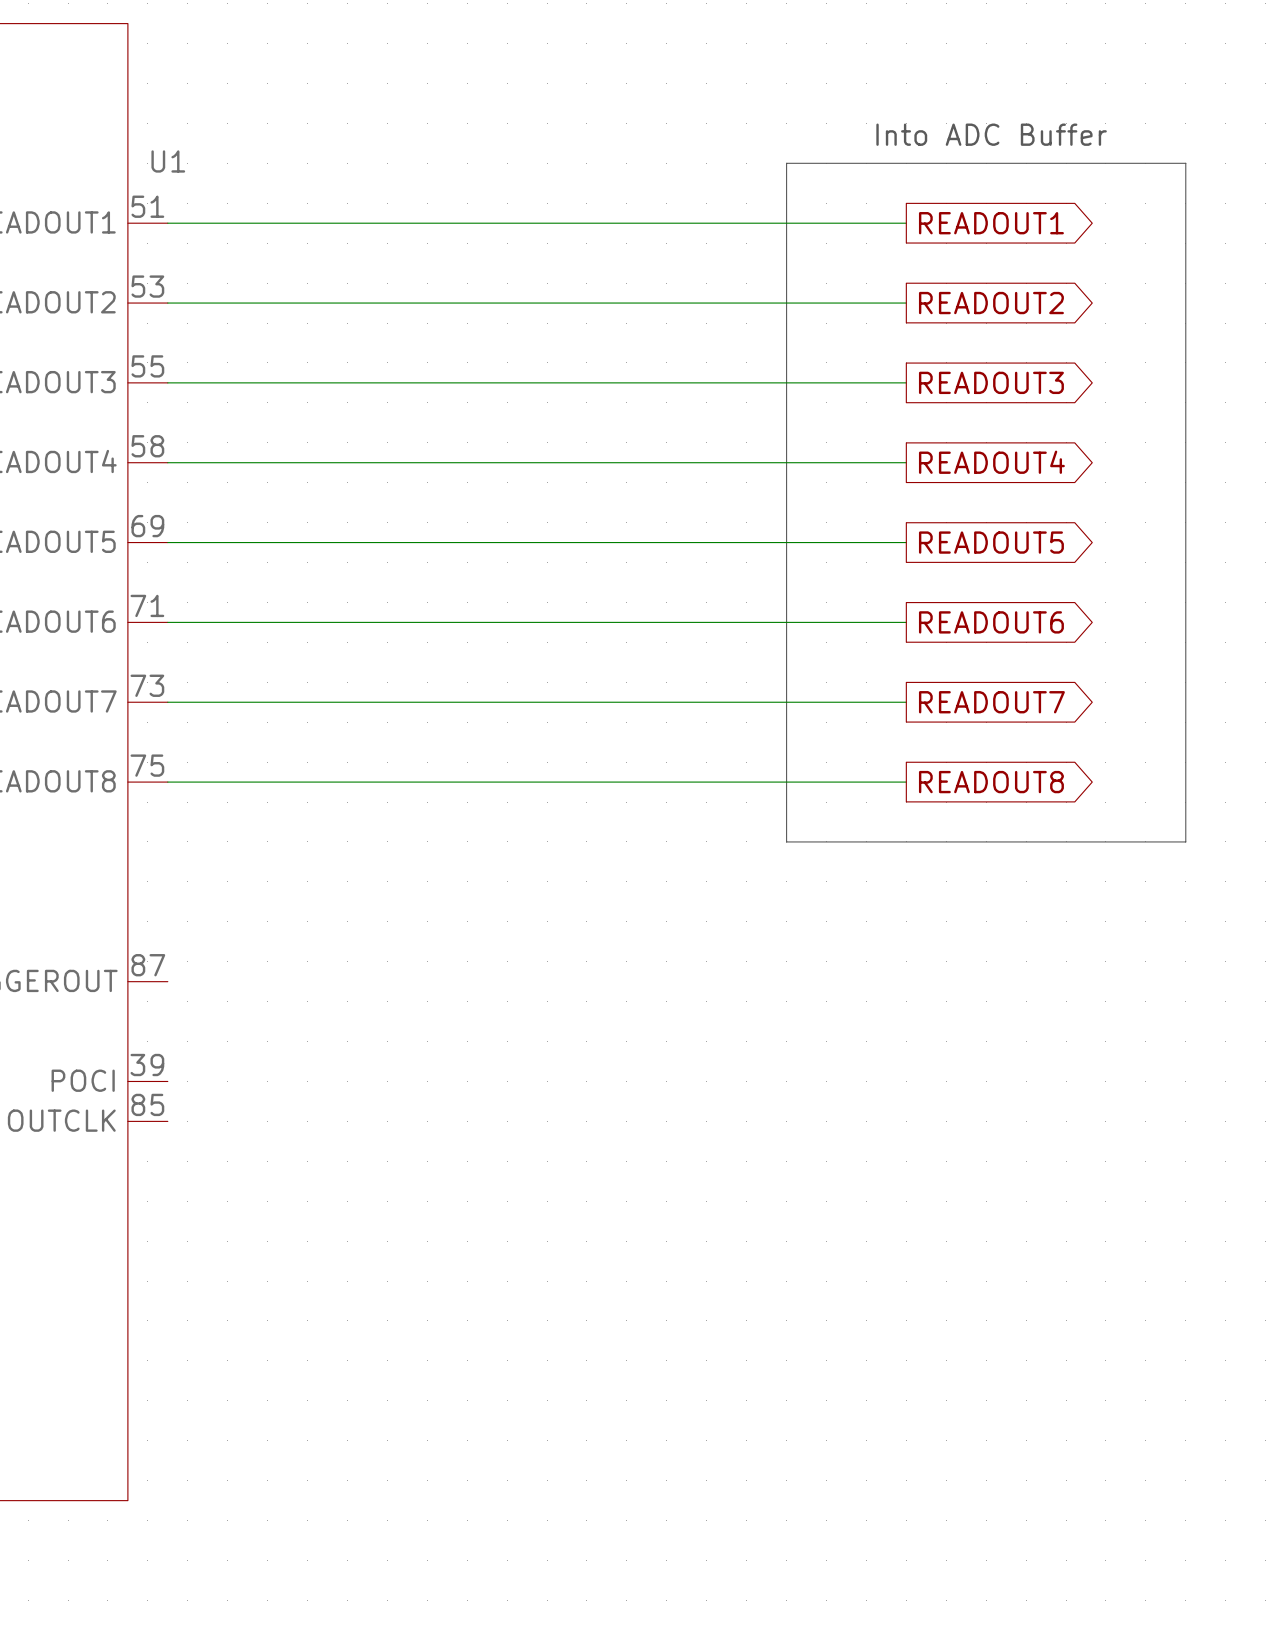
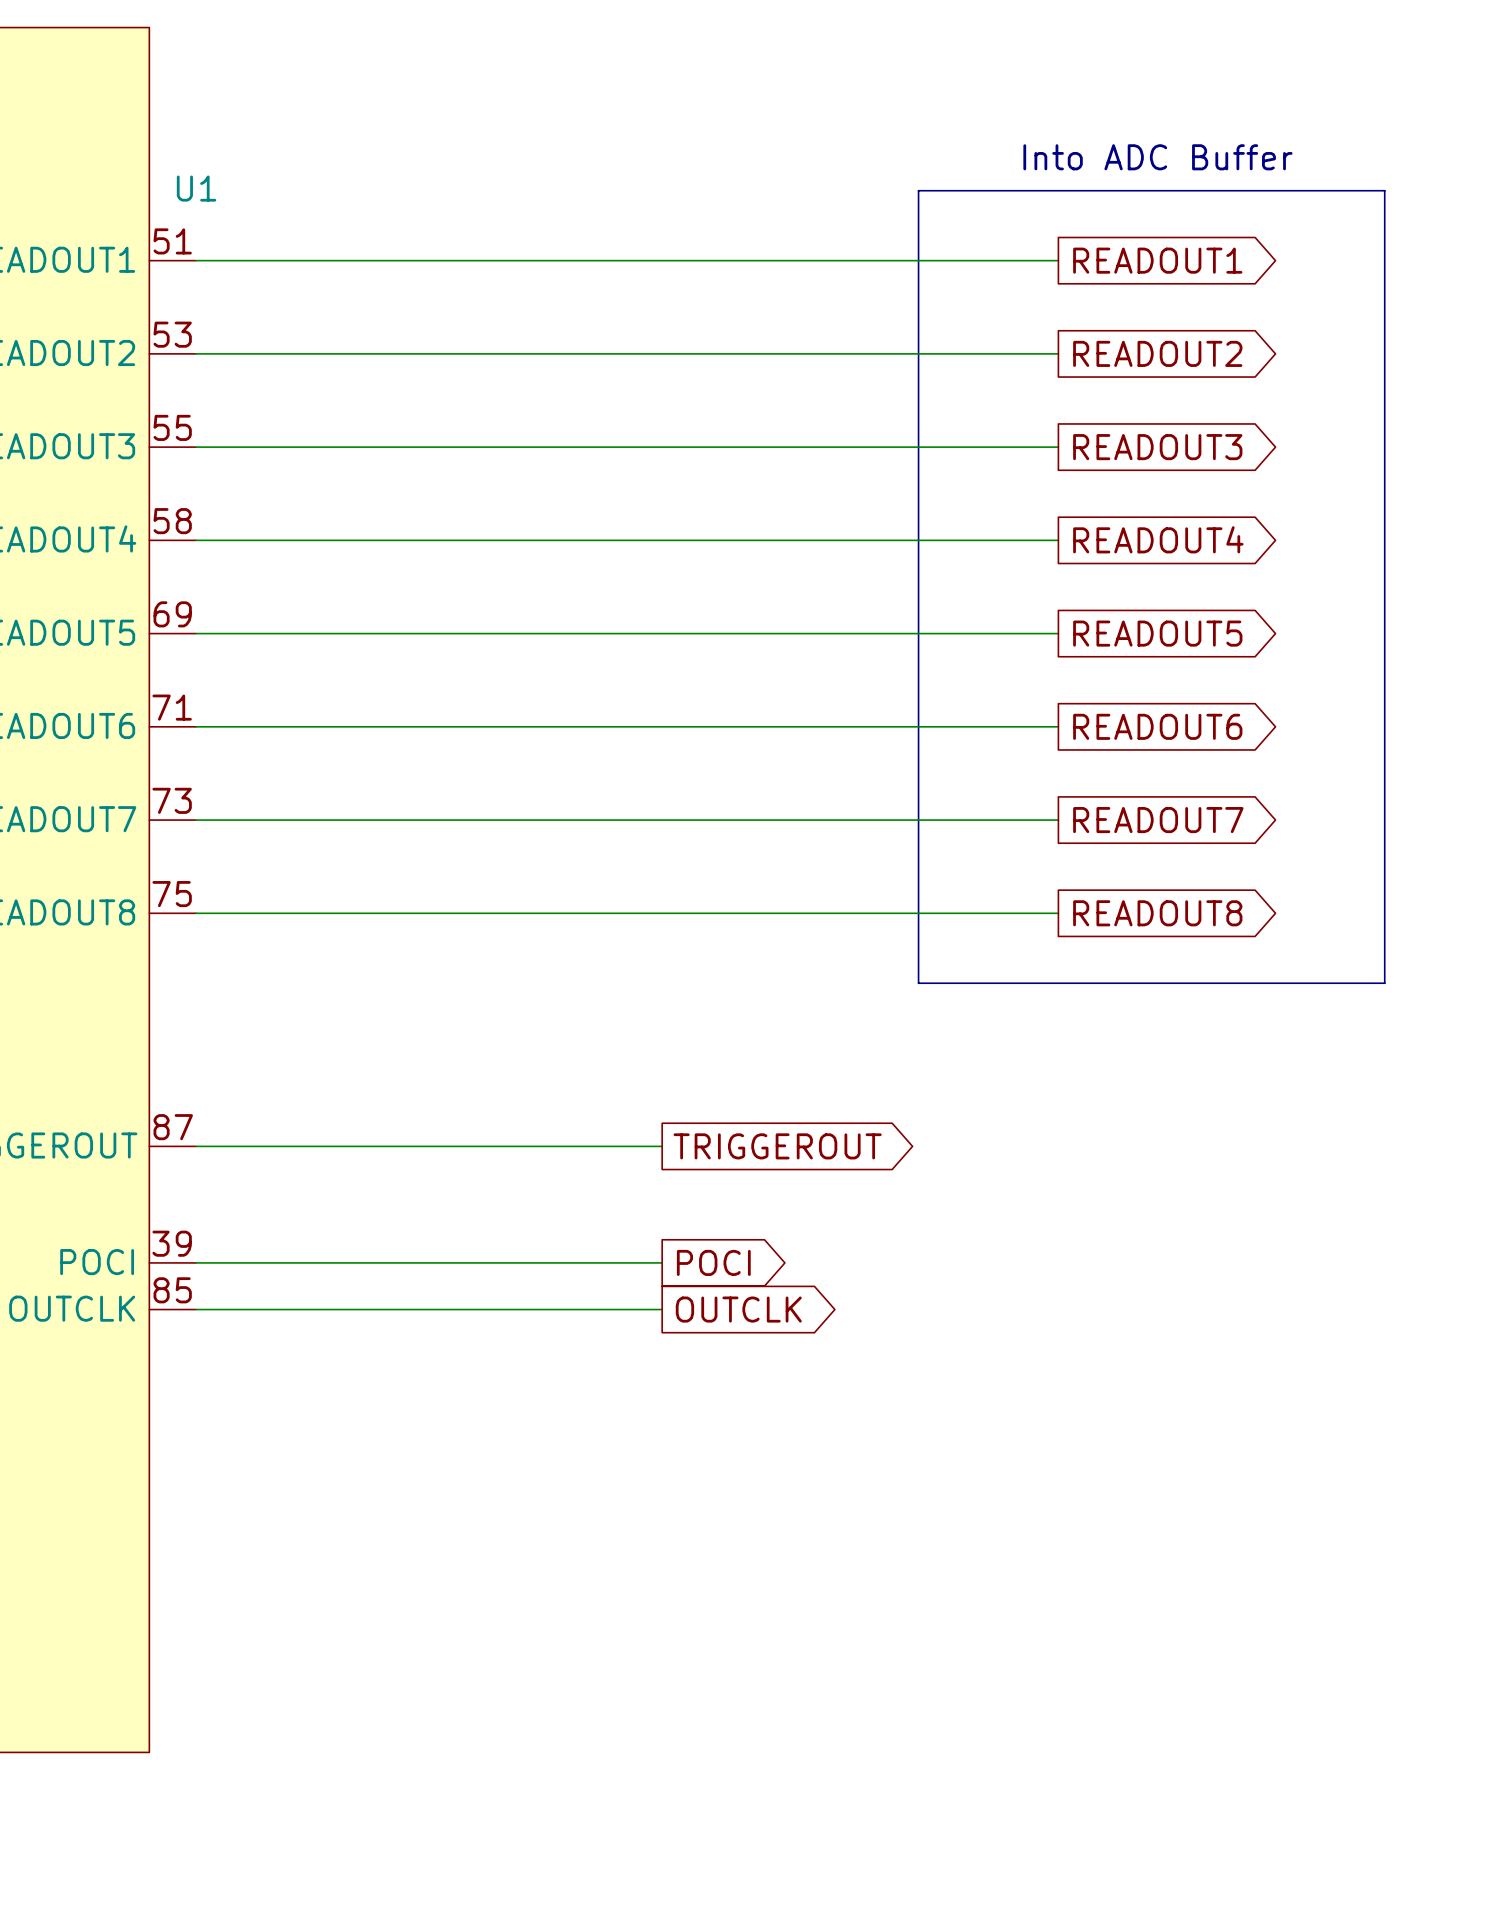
wire: none -> (195, 1146) (662, 1146)
global label: none -> TRIGGEROUT (777, 1146)
wire: none -> (195, 1262) (662, 1262)
global label: none -> POCI (713, 1262)
wire: none -> (195, 1309) (662, 1309)
global label: none -> OUTCLK (738, 1309)

